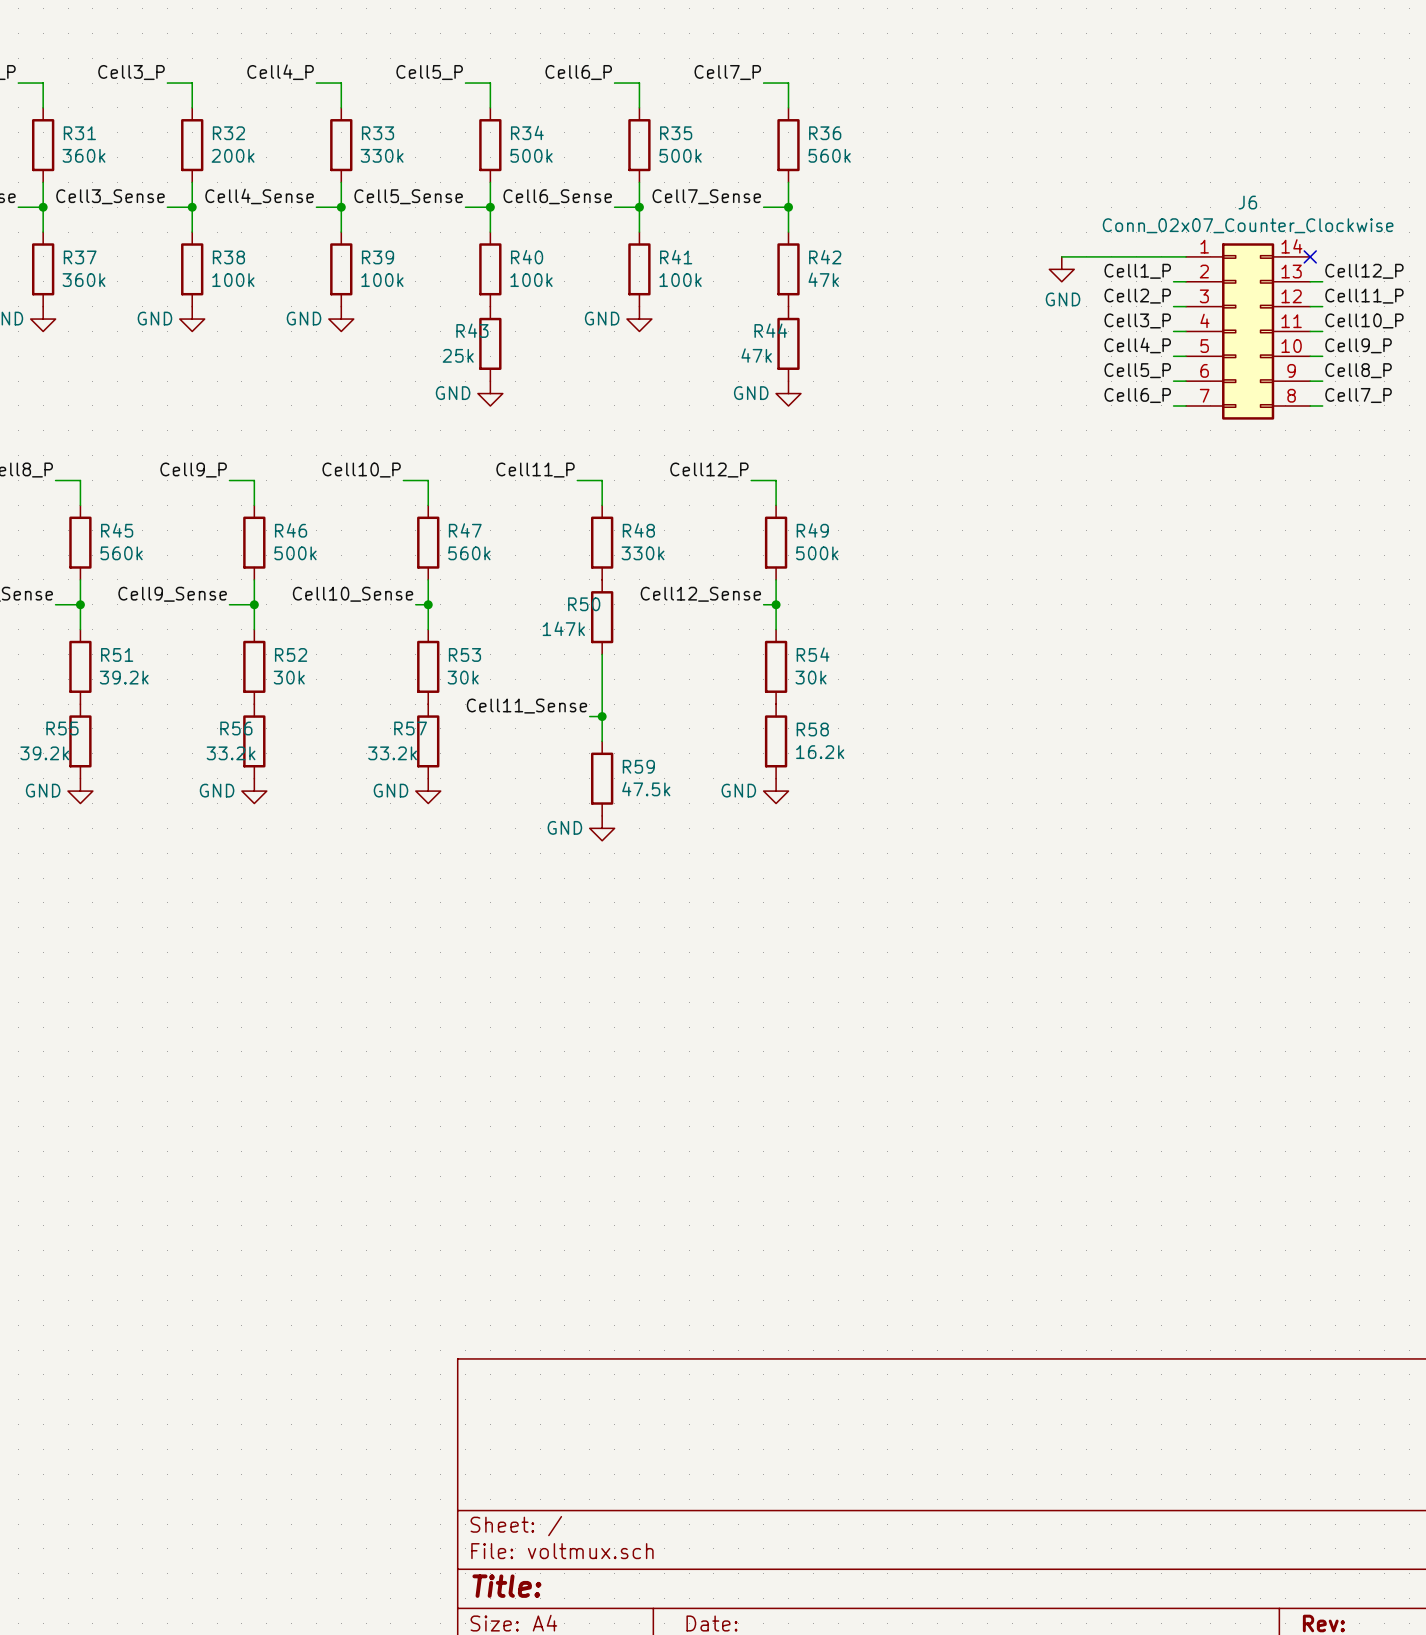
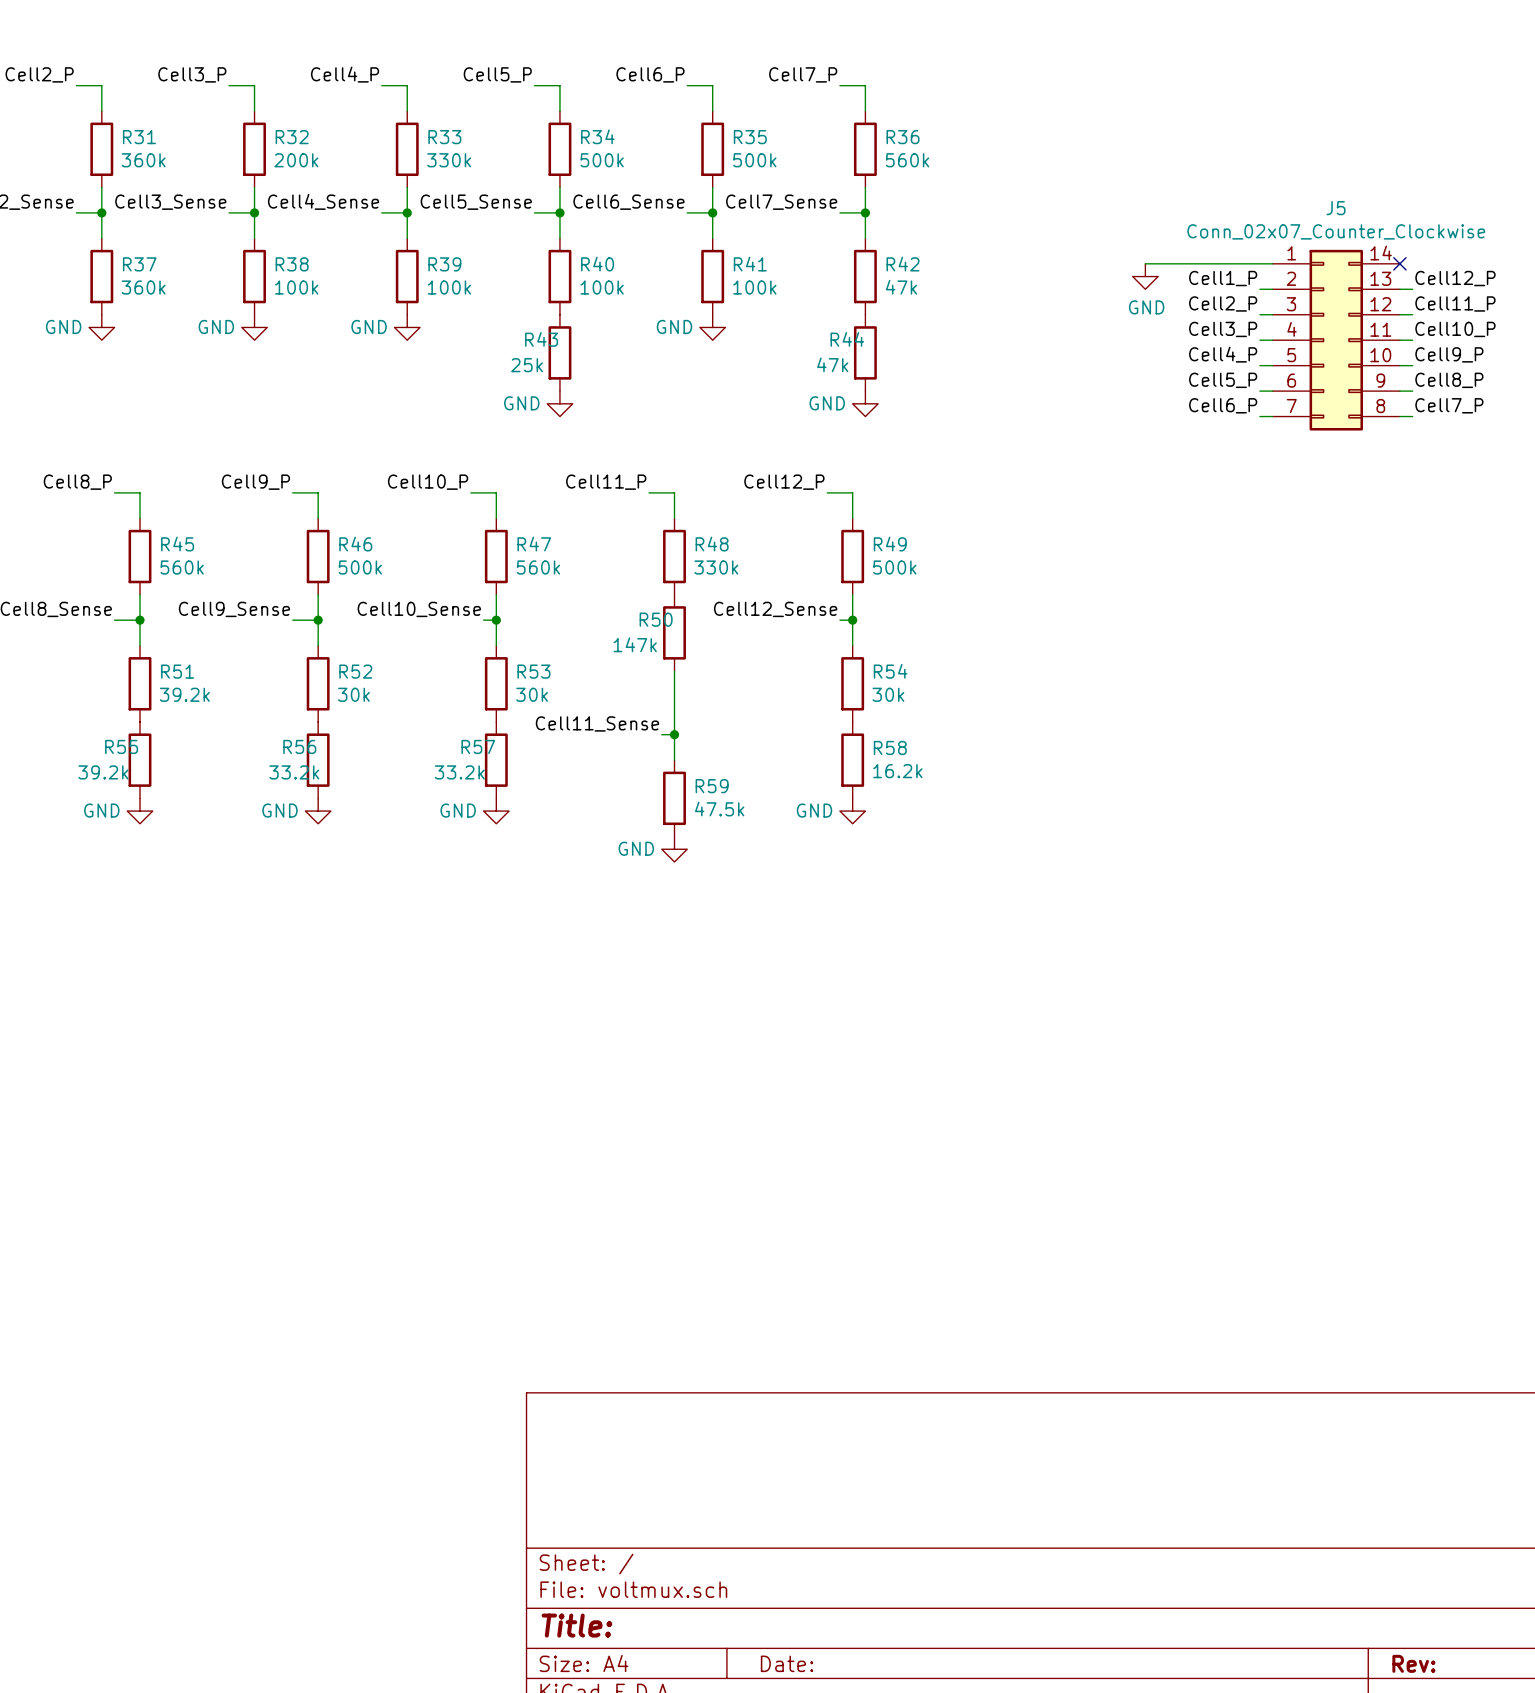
J6 name: J6 (1247, 202) -> J5 (1335, 208)

